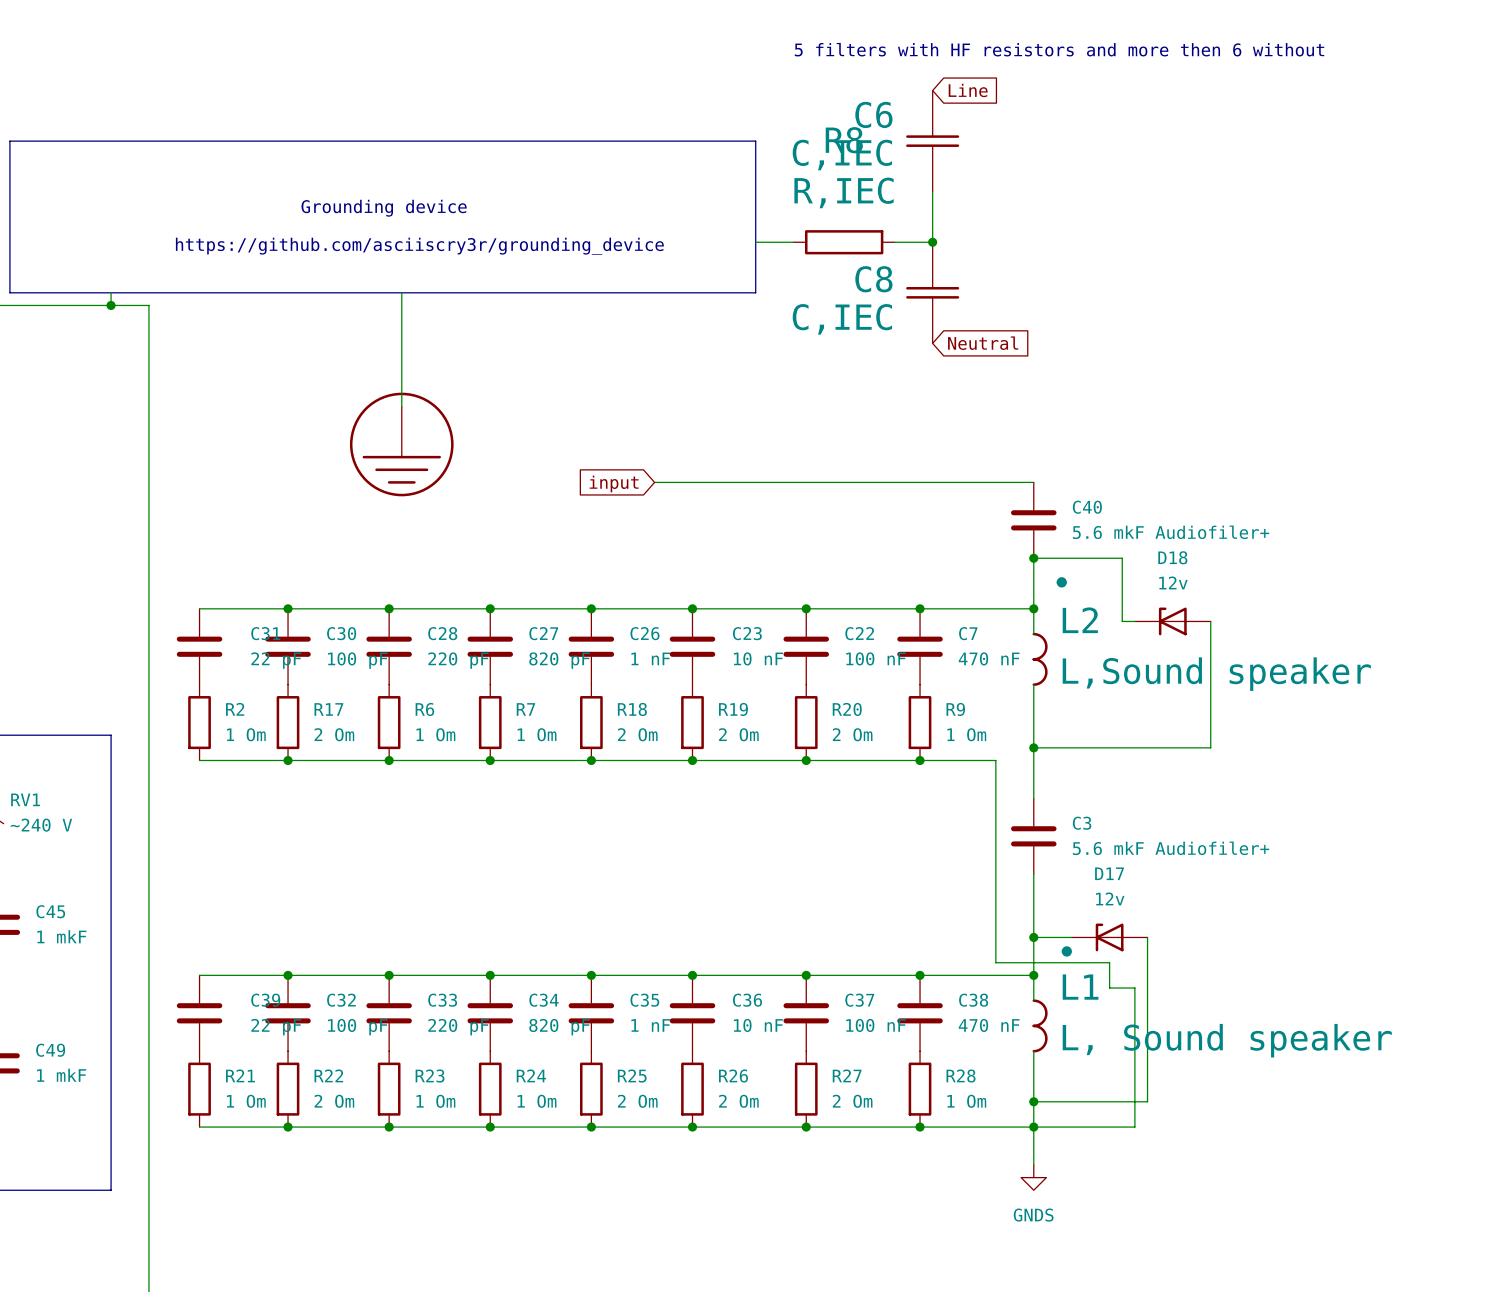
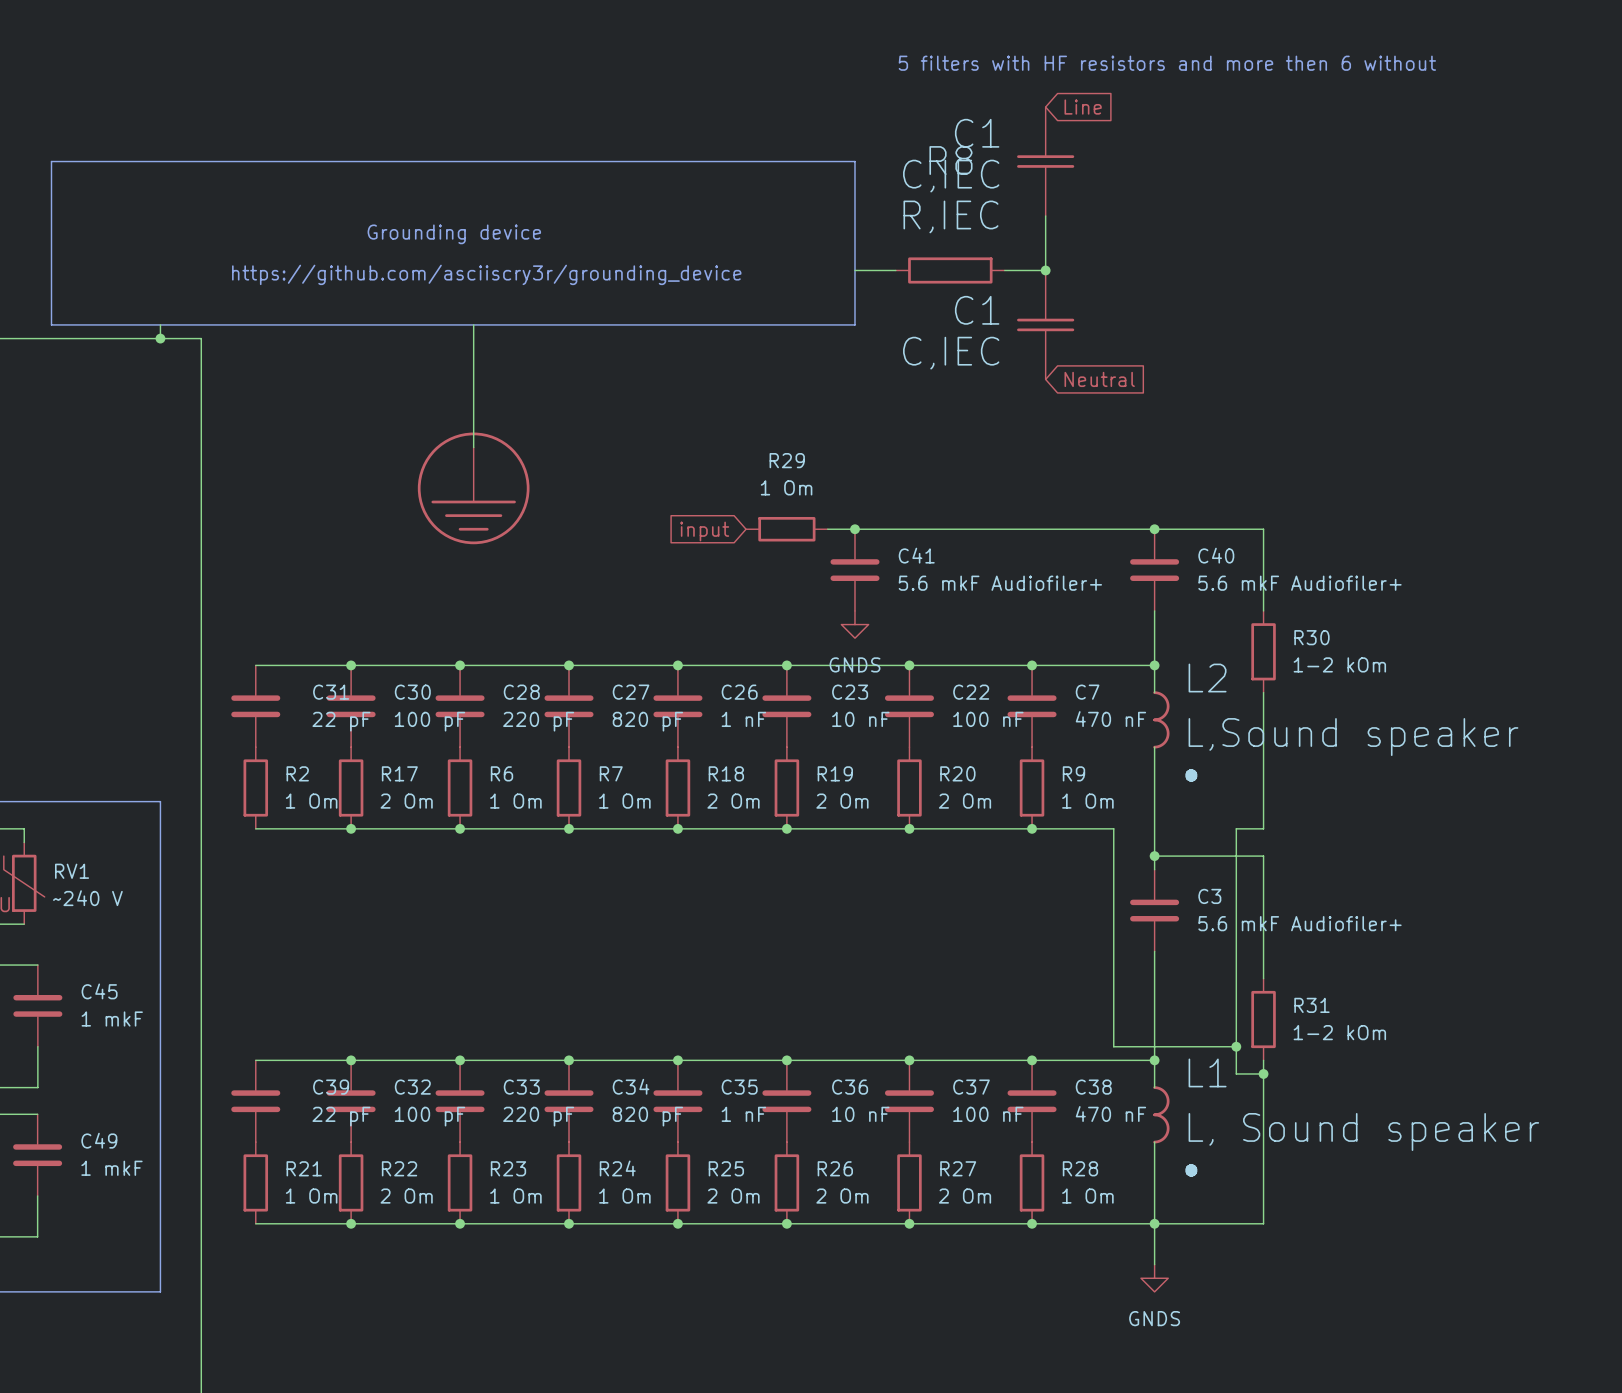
C6 name: C6 (873, 114) -> C1 (977, 133)
C8 name: C8 (873, 279) -> C1 (977, 310)
wire: (654, 482) (730, 482) -> none
R29: none -> 1 Om (786, 529)
junction: none -> (854, 529)
wire: none -> (1154, 529) (1263, 529) (1263, 610)
junction: none -> (1154, 529)
C41: none -> 5.6 mkF Audiofiler+ (854, 570)
wire: (1033, 558) (1122, 558) (1122, 621) (1134, 621) -> none
junction: (1033, 558) -> none
power symbol: none -> GNDS (854, 624)
L2 text position: ● (1061, 582) -> ● (1191, 775)
R30: none -> 1-2 kOm (1263, 651)
D18: 12v (1172, 621) -> none
wire: (1210, 621) (1210, 747) (1033, 747) -> none
wire: none -> (1263, 692) (1263, 828) (1236, 828) (1236, 1046)
junction position: (1033, 747) -> (1154, 856)
wire: none -> (1154, 856) (1263, 856) (1263, 978)
wire: (1033, 937) (1071, 937) -> none
junction: (1033, 937) -> none
D17: 12v (1109, 937) -> none
R31: none -> 1-2 kOm (1263, 1019)
wire: (1147, 937) (1147, 1101) (1033, 1101) -> none
L1 text position: ● (1066, 951) -> ● (1191, 1170)
junction: none -> (1236, 1046)
wire: none -> (1263, 1060) (1263, 1073)
junction: none -> (1263, 1073)
junction: (1033, 1101) -> none

